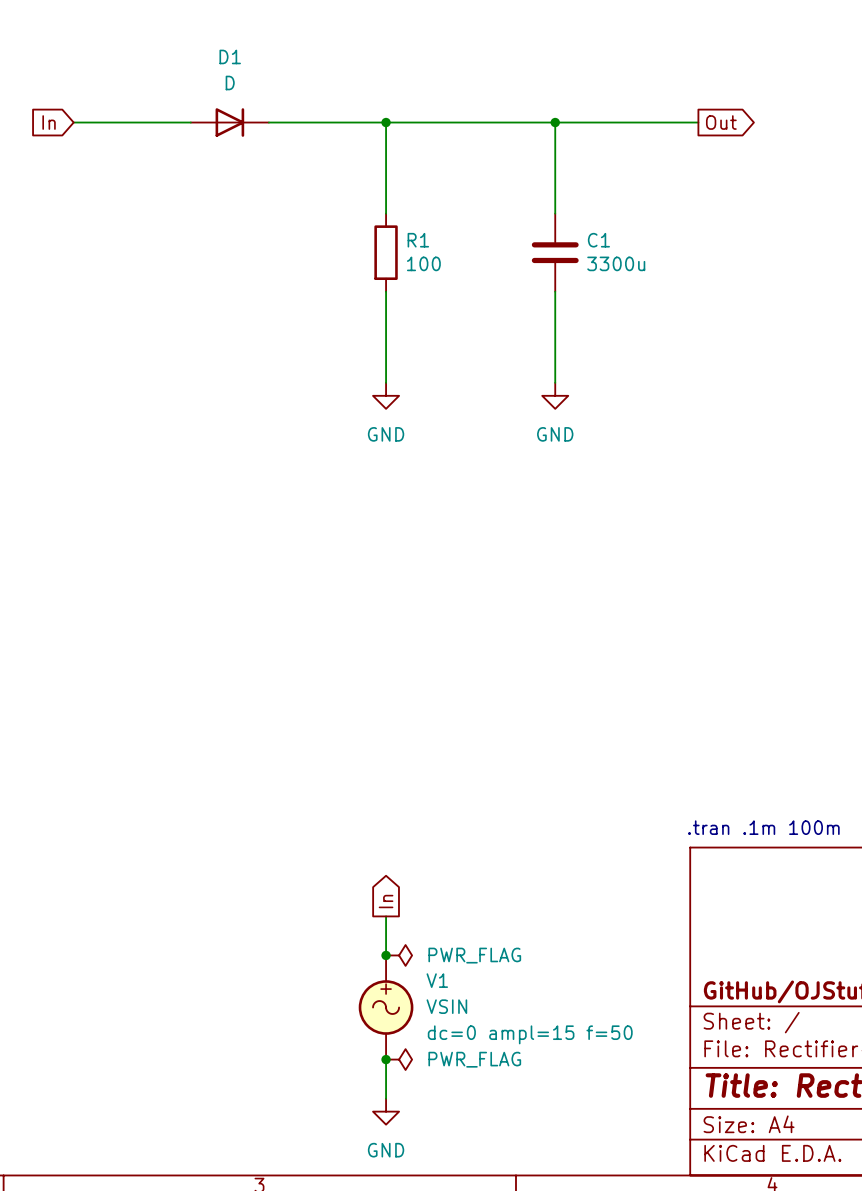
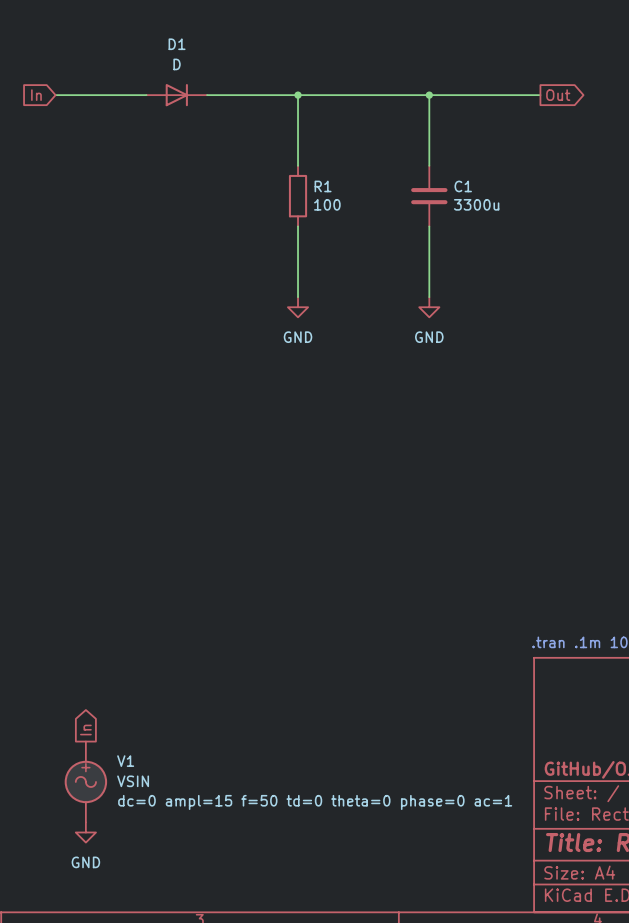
global label: In (386, 901) -> none
wire: (386, 916) (386, 955) -> none
global label: none -> In (85, 730)
junction: (386, 955) -> none
power symbol: PWR_FLAG (399, 955) -> none
V1 position: (386, 1007) -> (85, 781)
V1 text: dc=0 ampl=15 f=50 (530, 1034) -> dc=0 ampl=15 f=50 td=0 theta=0 phase=0 ac=1 (315, 802)
wire: (386, 1059) (386, 1098) -> none
junction: (386, 1059) -> none
power symbol: PWR_FLAG (399, 1059) -> none
power symbol: none -> GND (85, 832)
power symbol: GND (386, 1111) -> none

